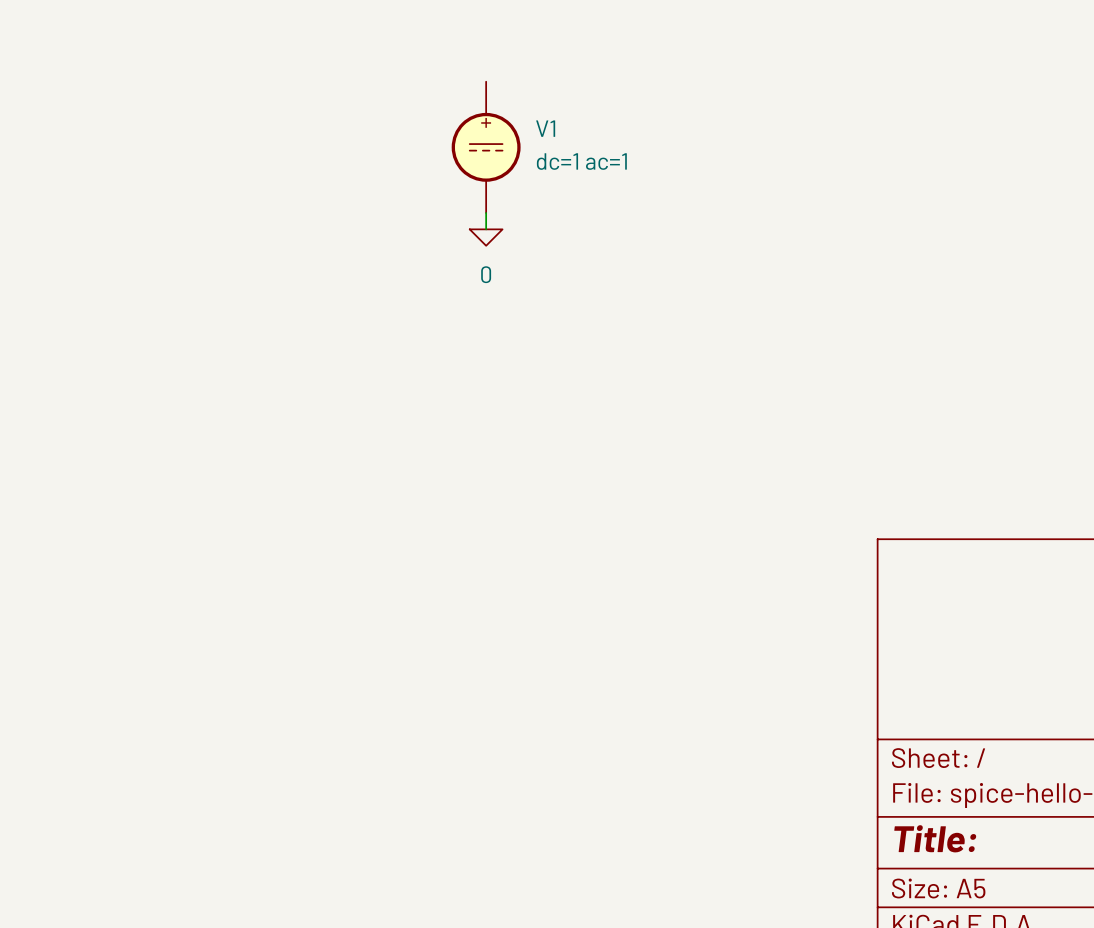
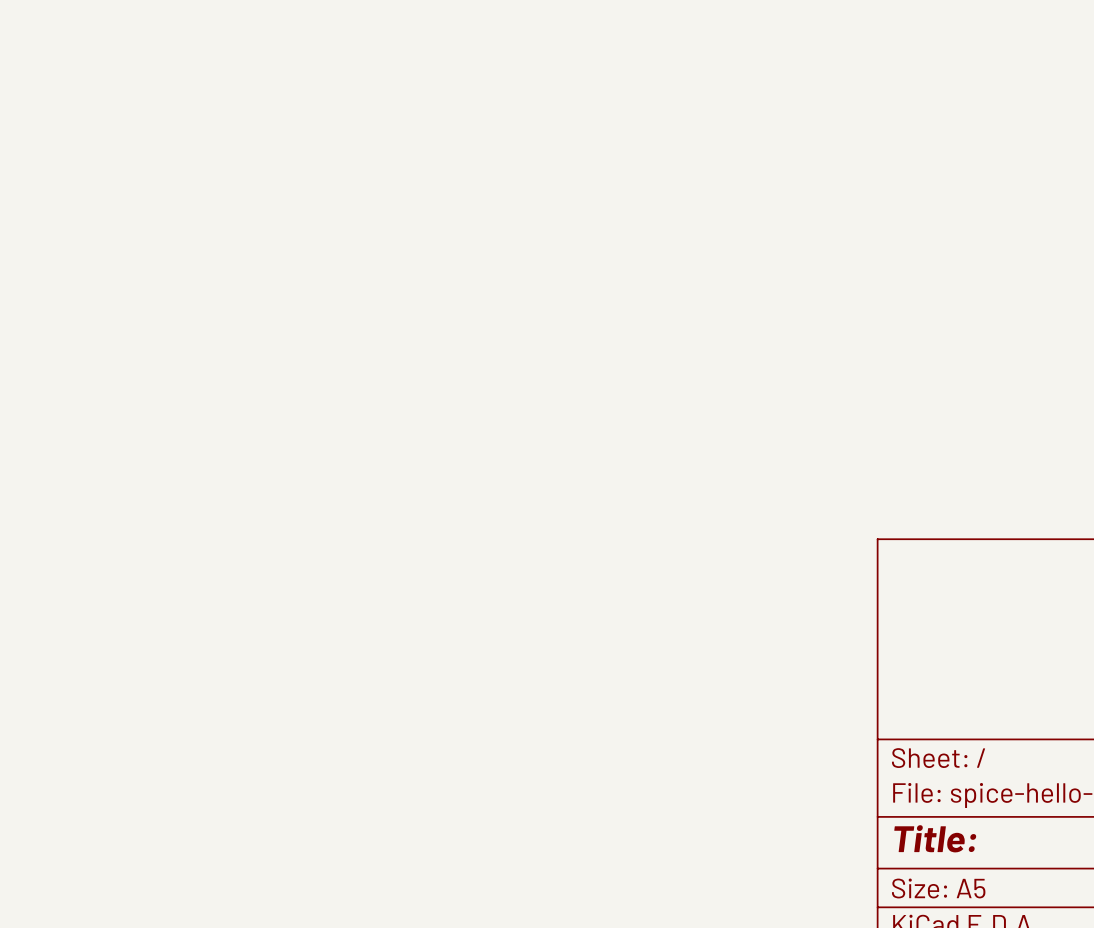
V1: dc=1 ac=1 (486, 147) -> none
wire: (486, 212) (486, 229) -> none
power symbol: 0 (486, 237) -> none

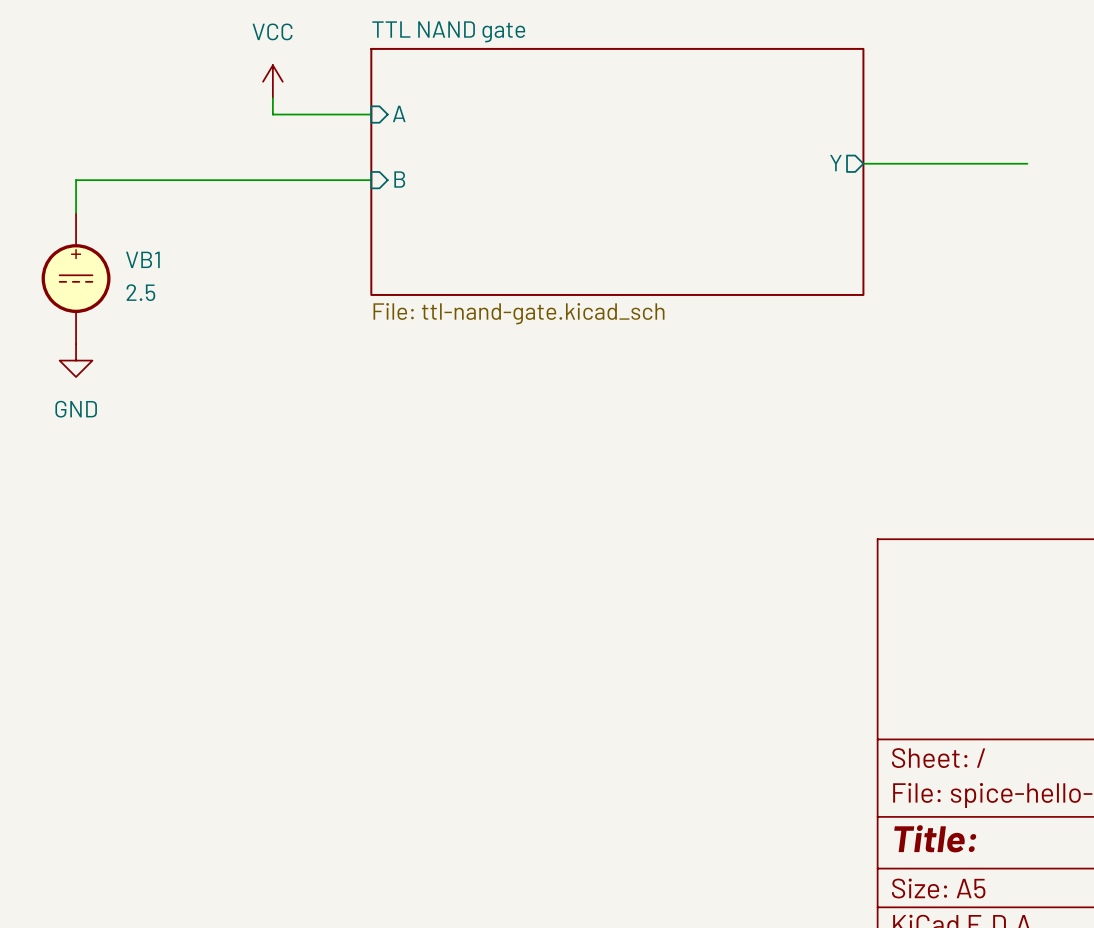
power symbol: none -> VCC (272, 81)
wire: none -> (272, 98) (272, 114) (371, 114)
sheet pin: none -> A (399, 113)
sheet pin: none -> Y (835, 163)
wire: none -> (863, 163) (1027, 163)
sheet TTL NAND gate: none -> File: ttl-nand-gate.kicad_sch (617, 171)
sheet pin: none -> B (399, 179)
wire: none -> (371, 180) (76, 180) (76, 212)
VB1: none -> 2.5 (76, 278)
power symbol: none -> GND (76, 360)

